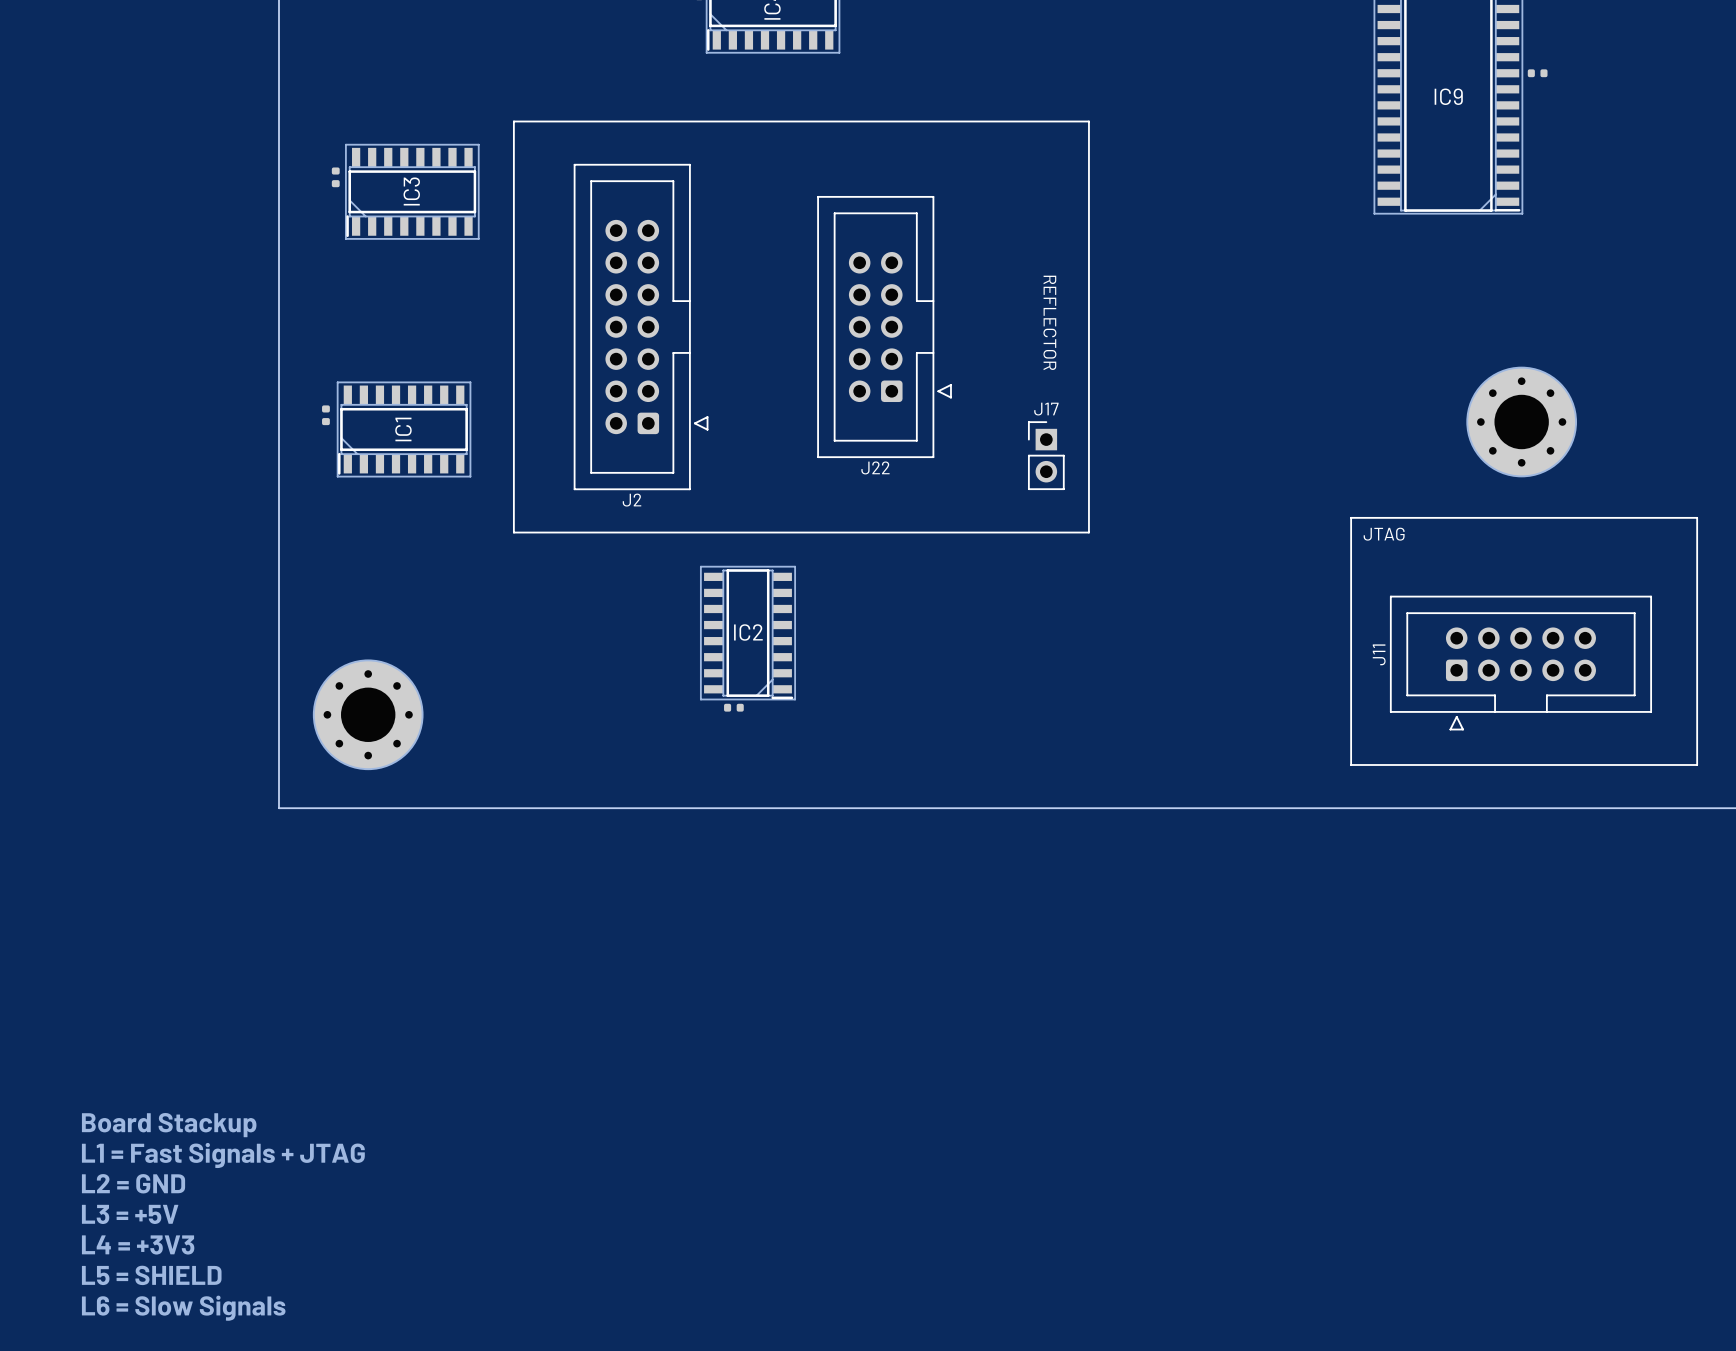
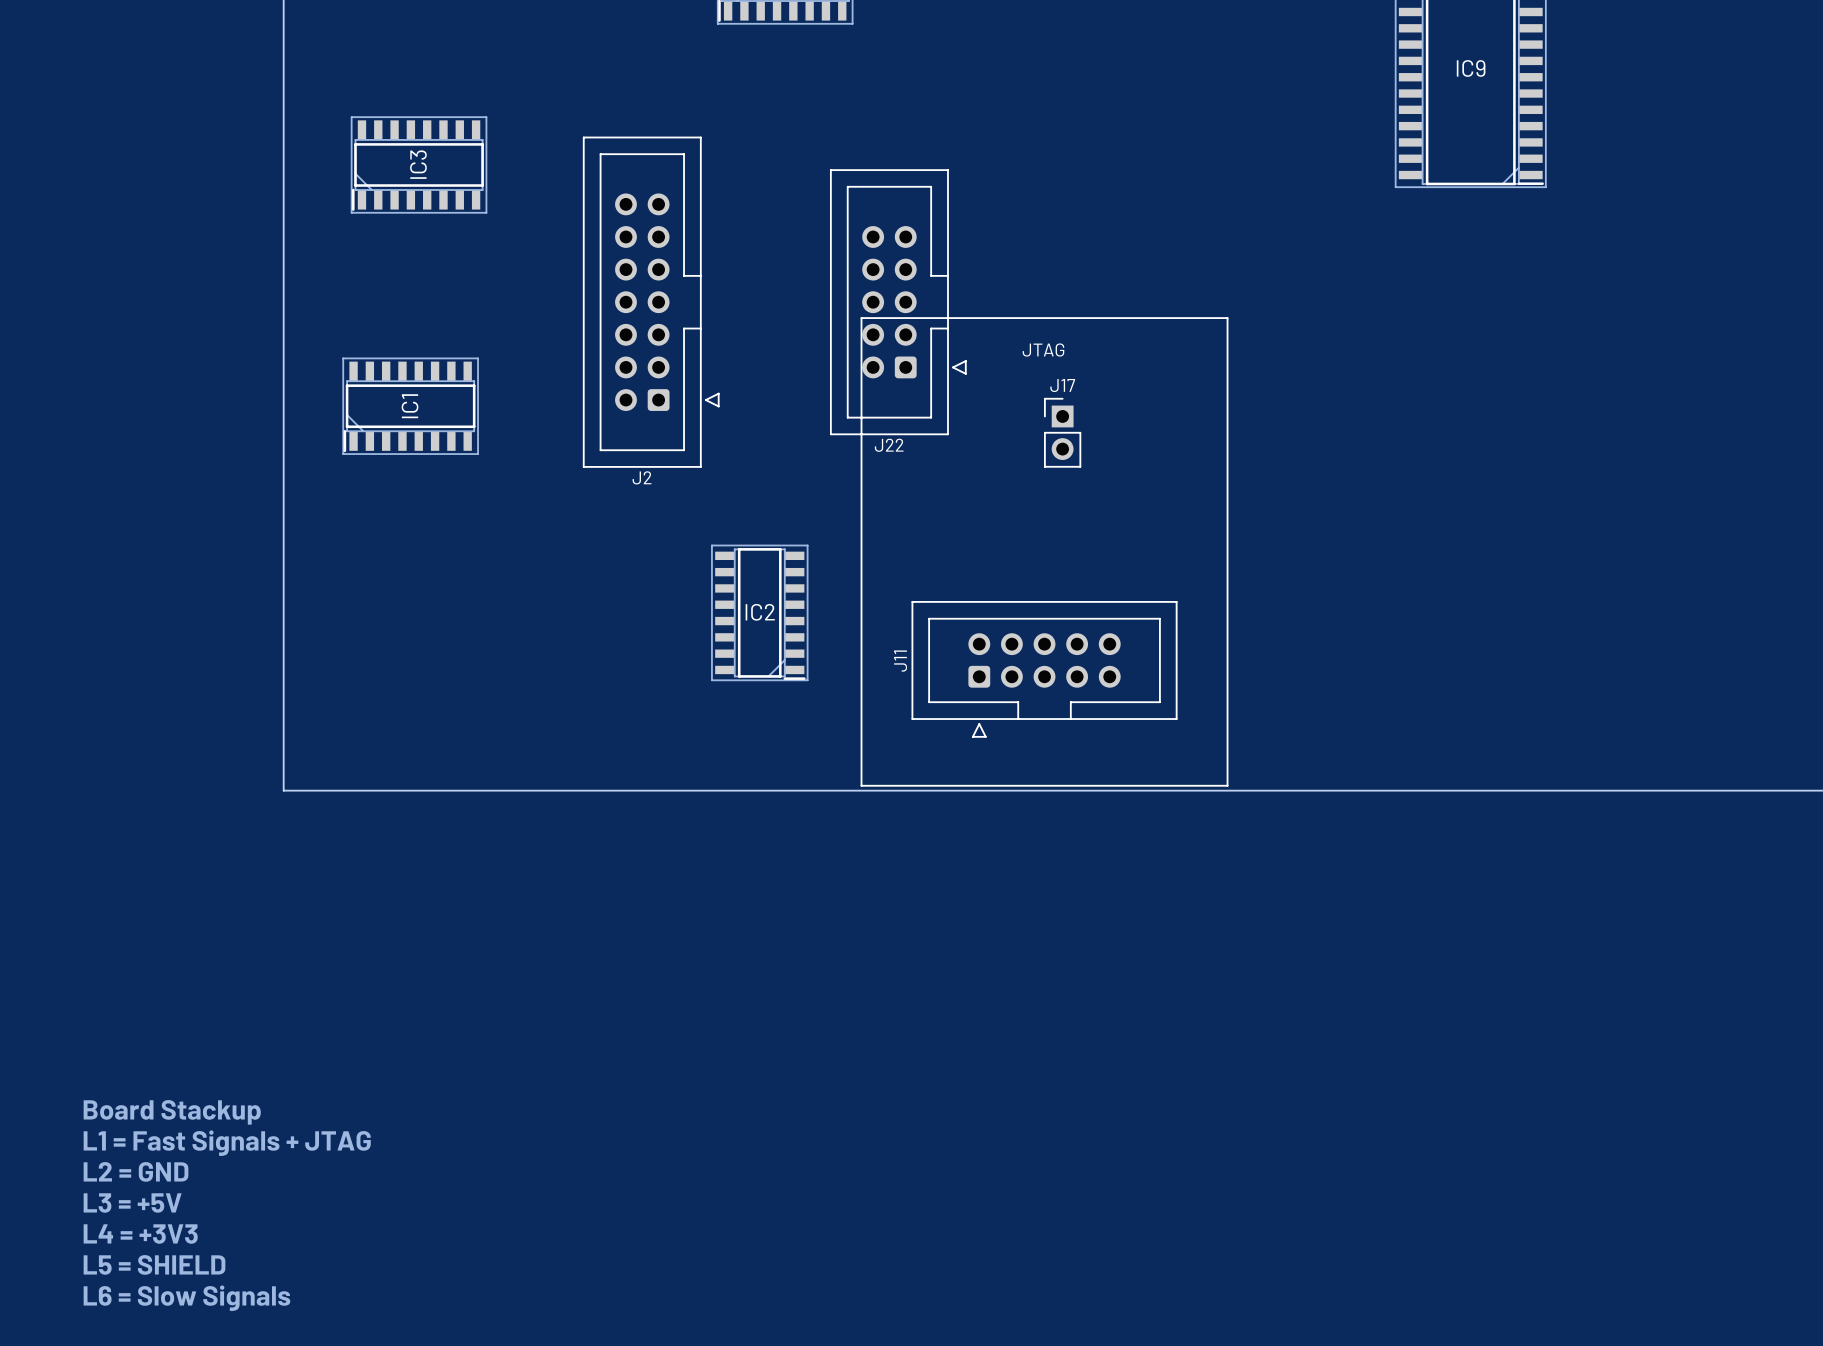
part: (1537, 73) -> none
line: (513, 121) (1088, 121) (1088, 532) (513, 532) (513, 121) -> none
part: (335, 177) -> none
text: REFLECTOR (1049, 322) -> none
line: none -> (861, 318) (1227, 318) (1227, 785) (861, 785) (861, 318)
text: none -> JTAG (1043, 350)
part: (325, 415) -> none
part: (1521, 422) -> none
line: (1351, 517) (1697, 517) (1697, 764) (1351, 764) (1351, 517) -> none
text: JTAG (1384, 534) -> none
J11 position: (1520, 663) -> (1044, 669)
part: (733, 707) -> none
part: (368, 714) -> none

